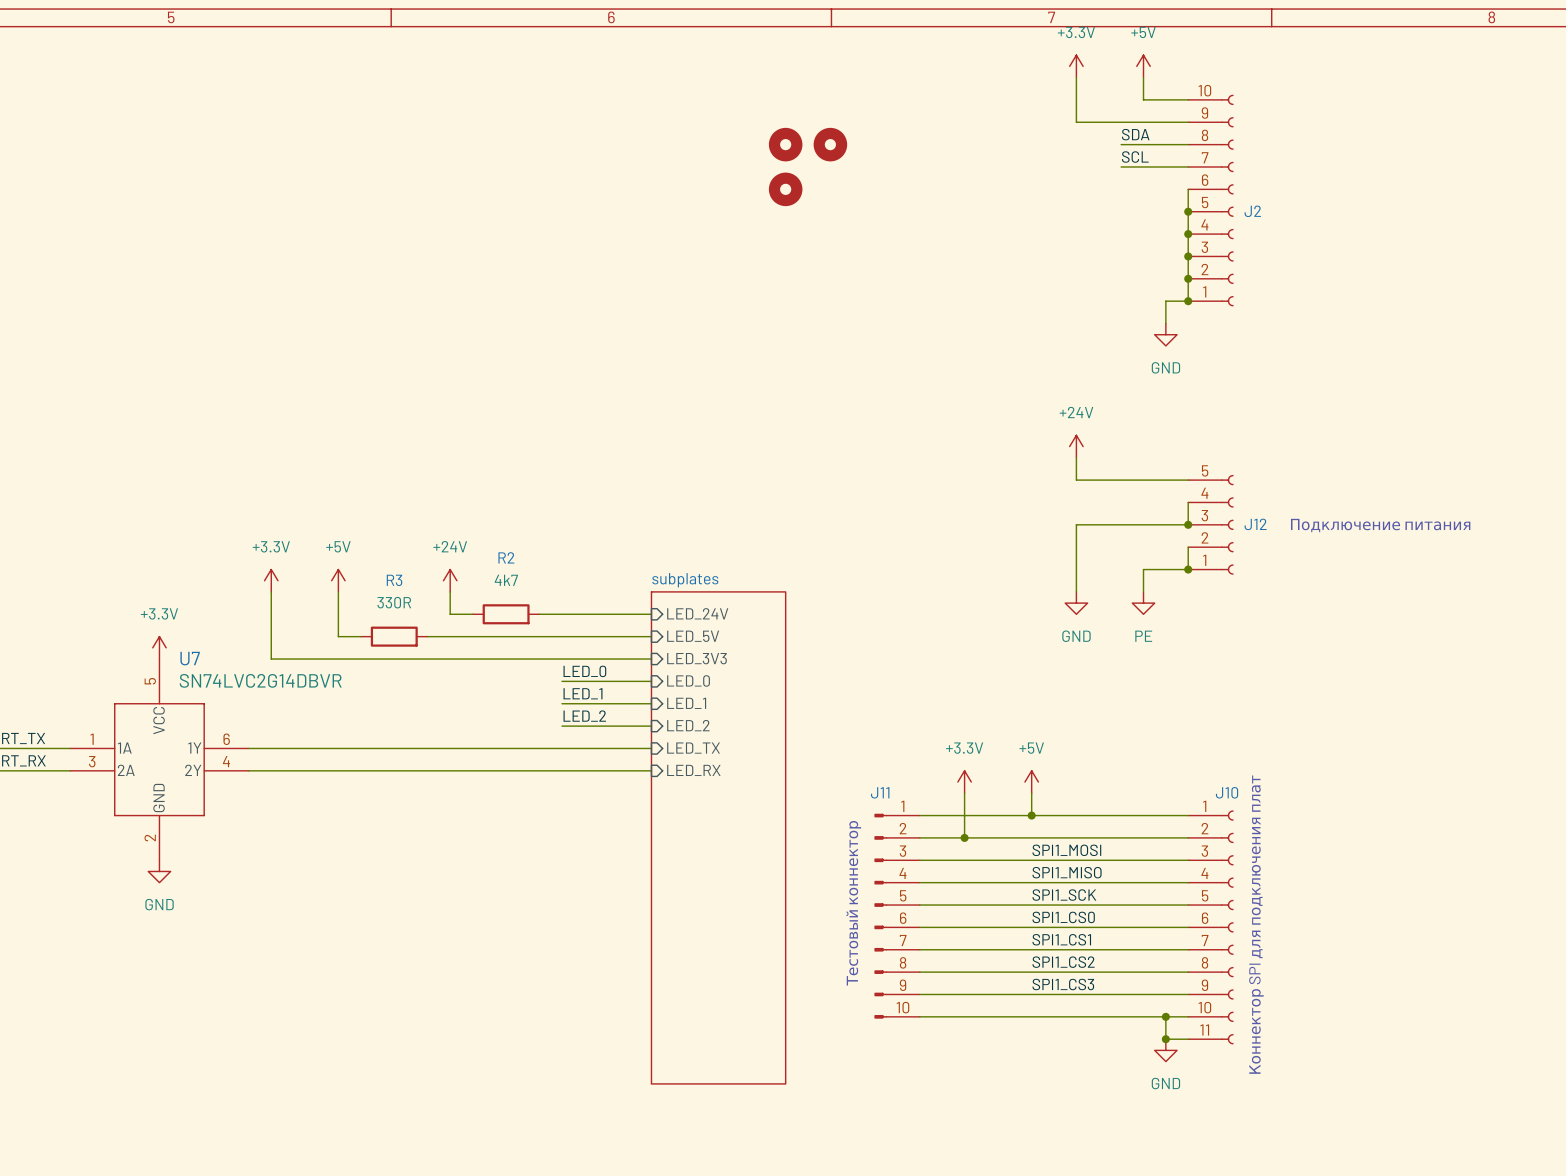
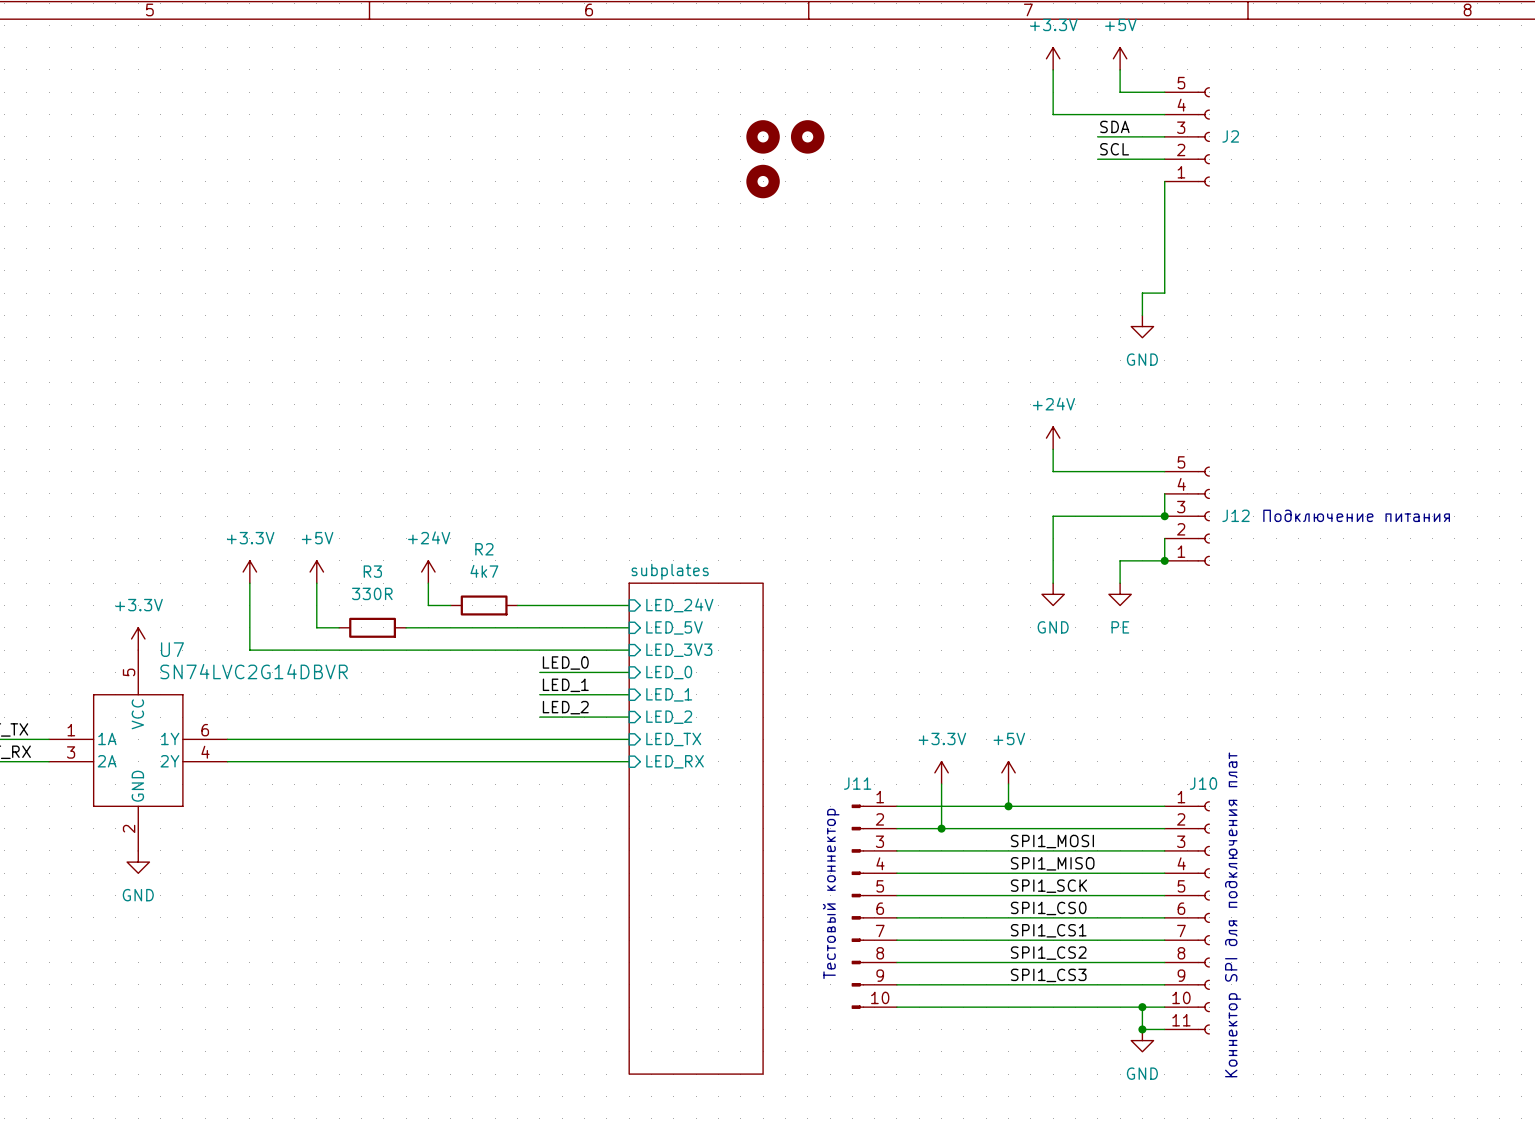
J2 symbol: [1188, 94, 1234, 307] -> [1164, 87, 1211, 187]
junction: (1188, 211) -> none
junction: (1188, 234) -> none
junction: (1188, 256) -> none
junction: (1188, 278) -> none
junction: (1188, 301) -> none

